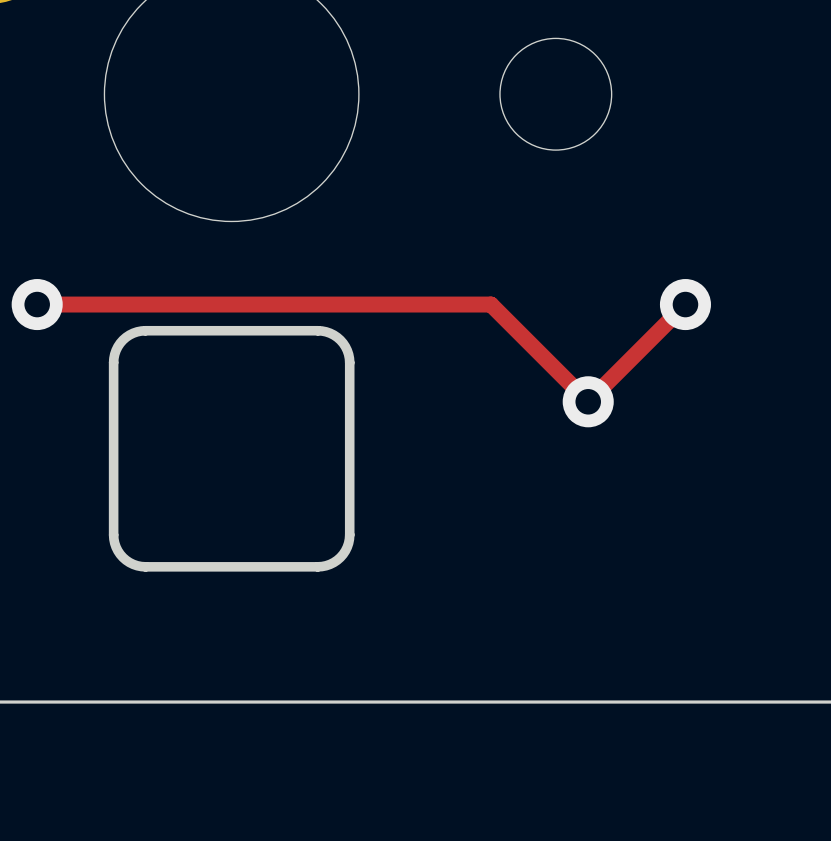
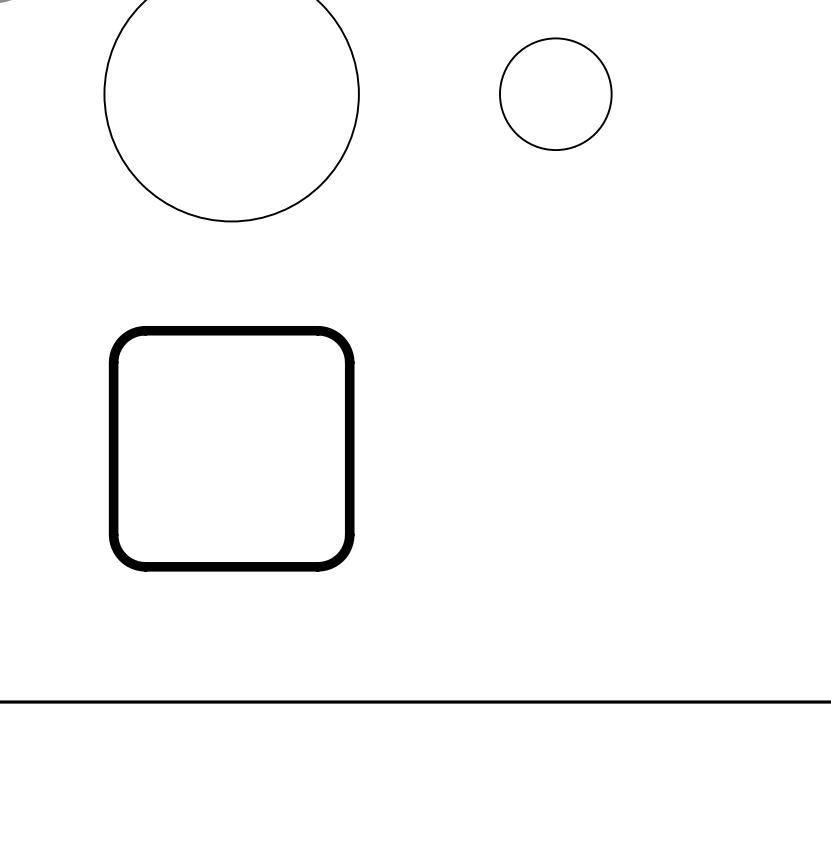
track: (37, 304) (490, 304) (588, 401) (685, 304) -> none
via: (37, 304) -> none
via: (685, 304) -> none
via: (588, 401) -> none

